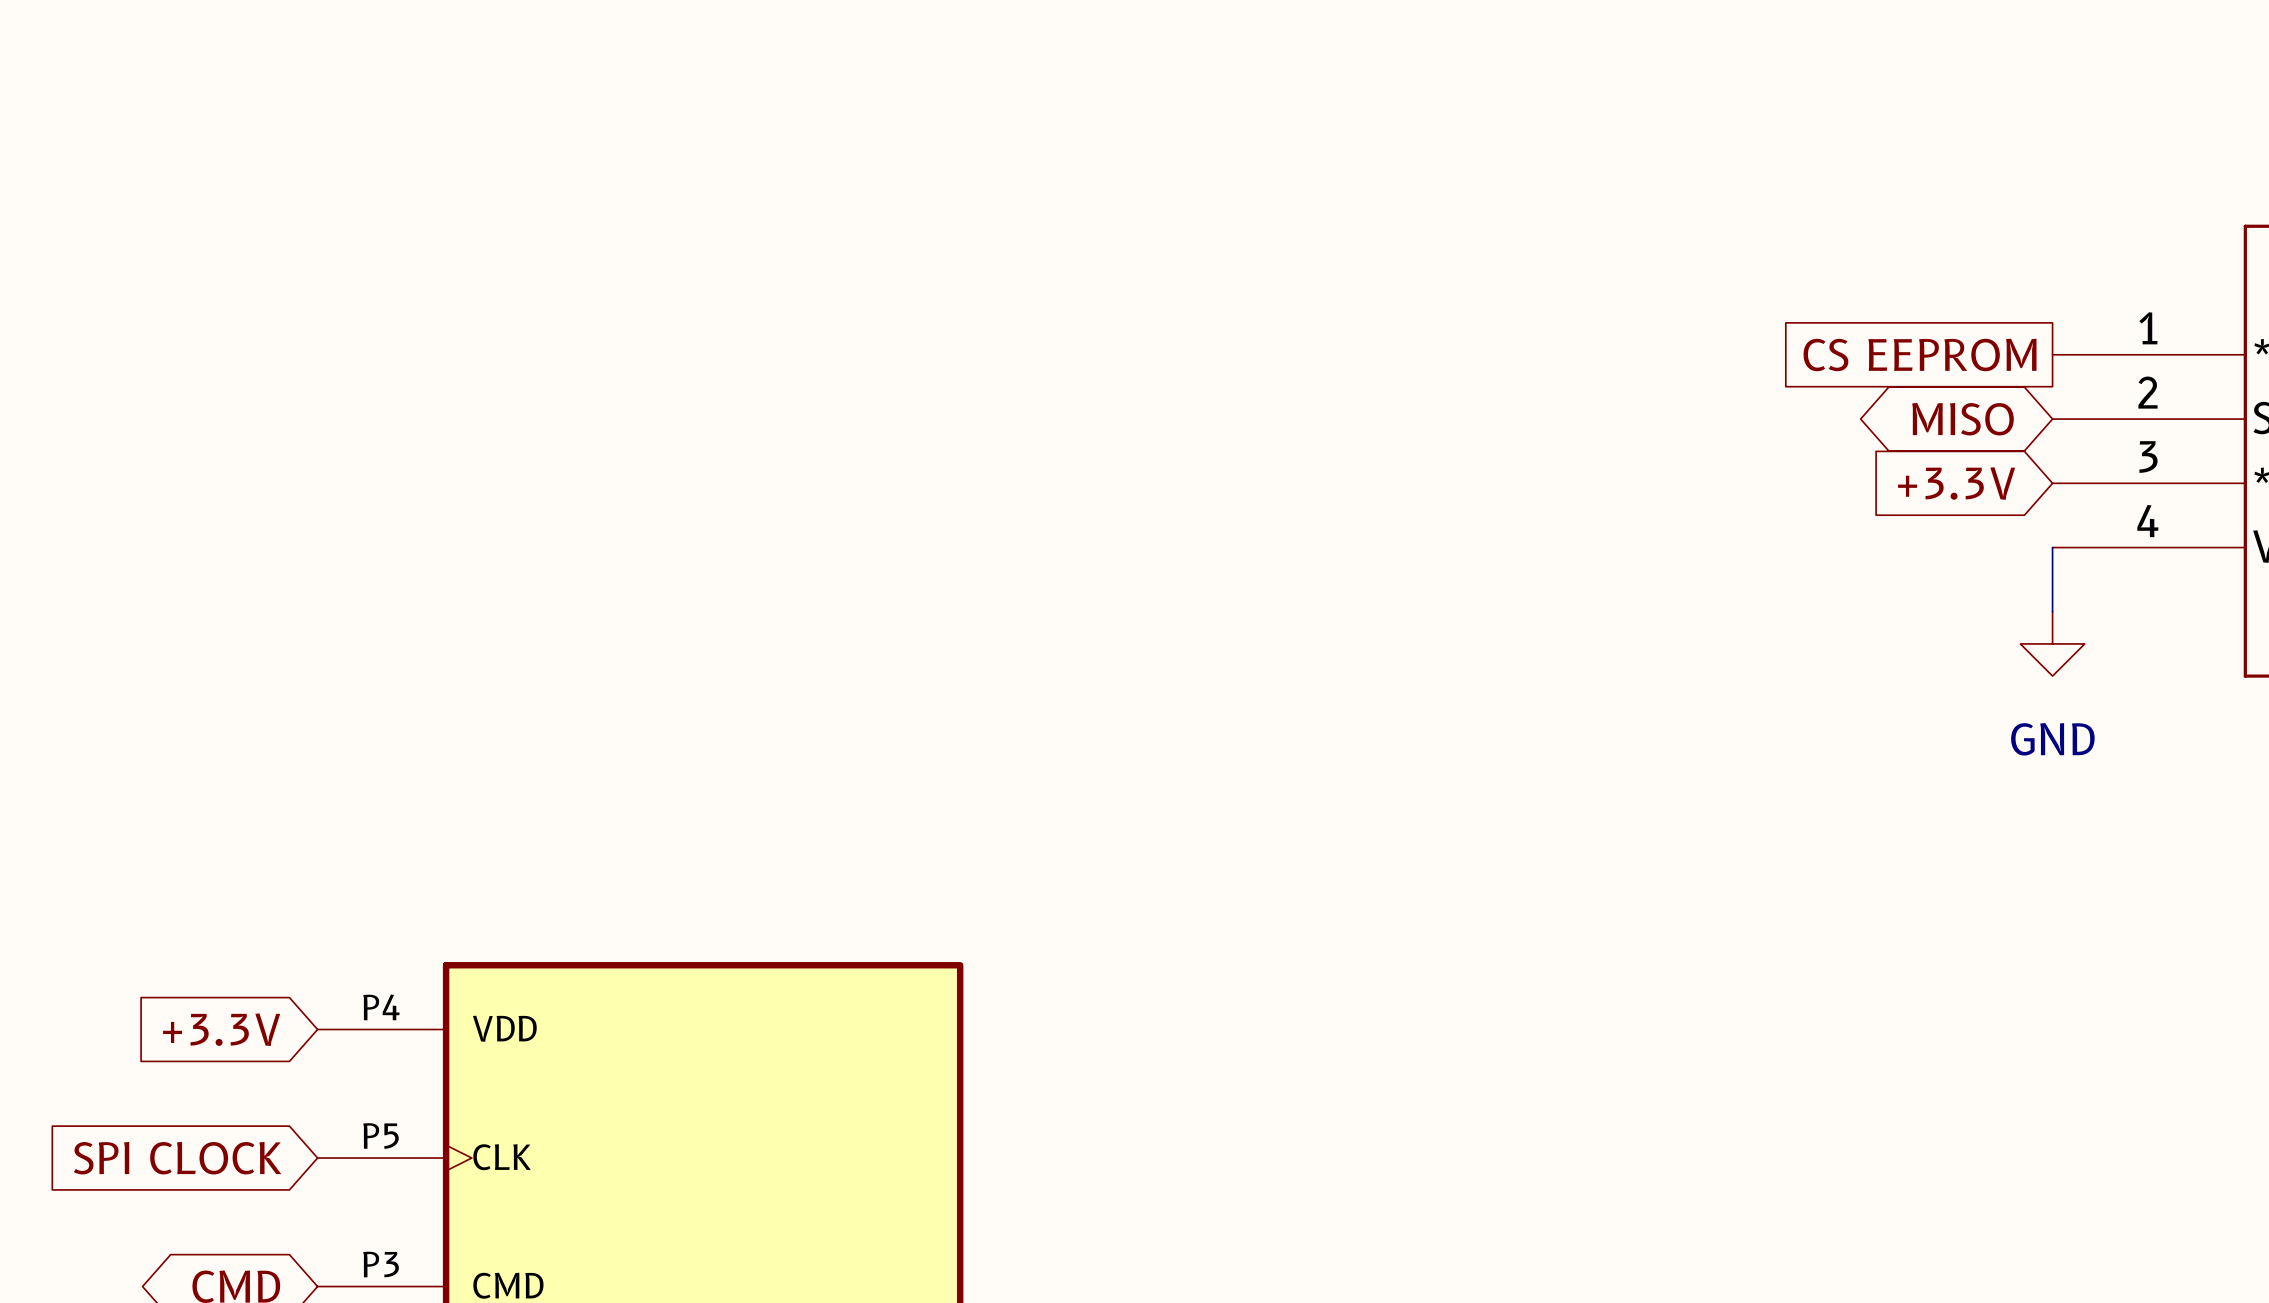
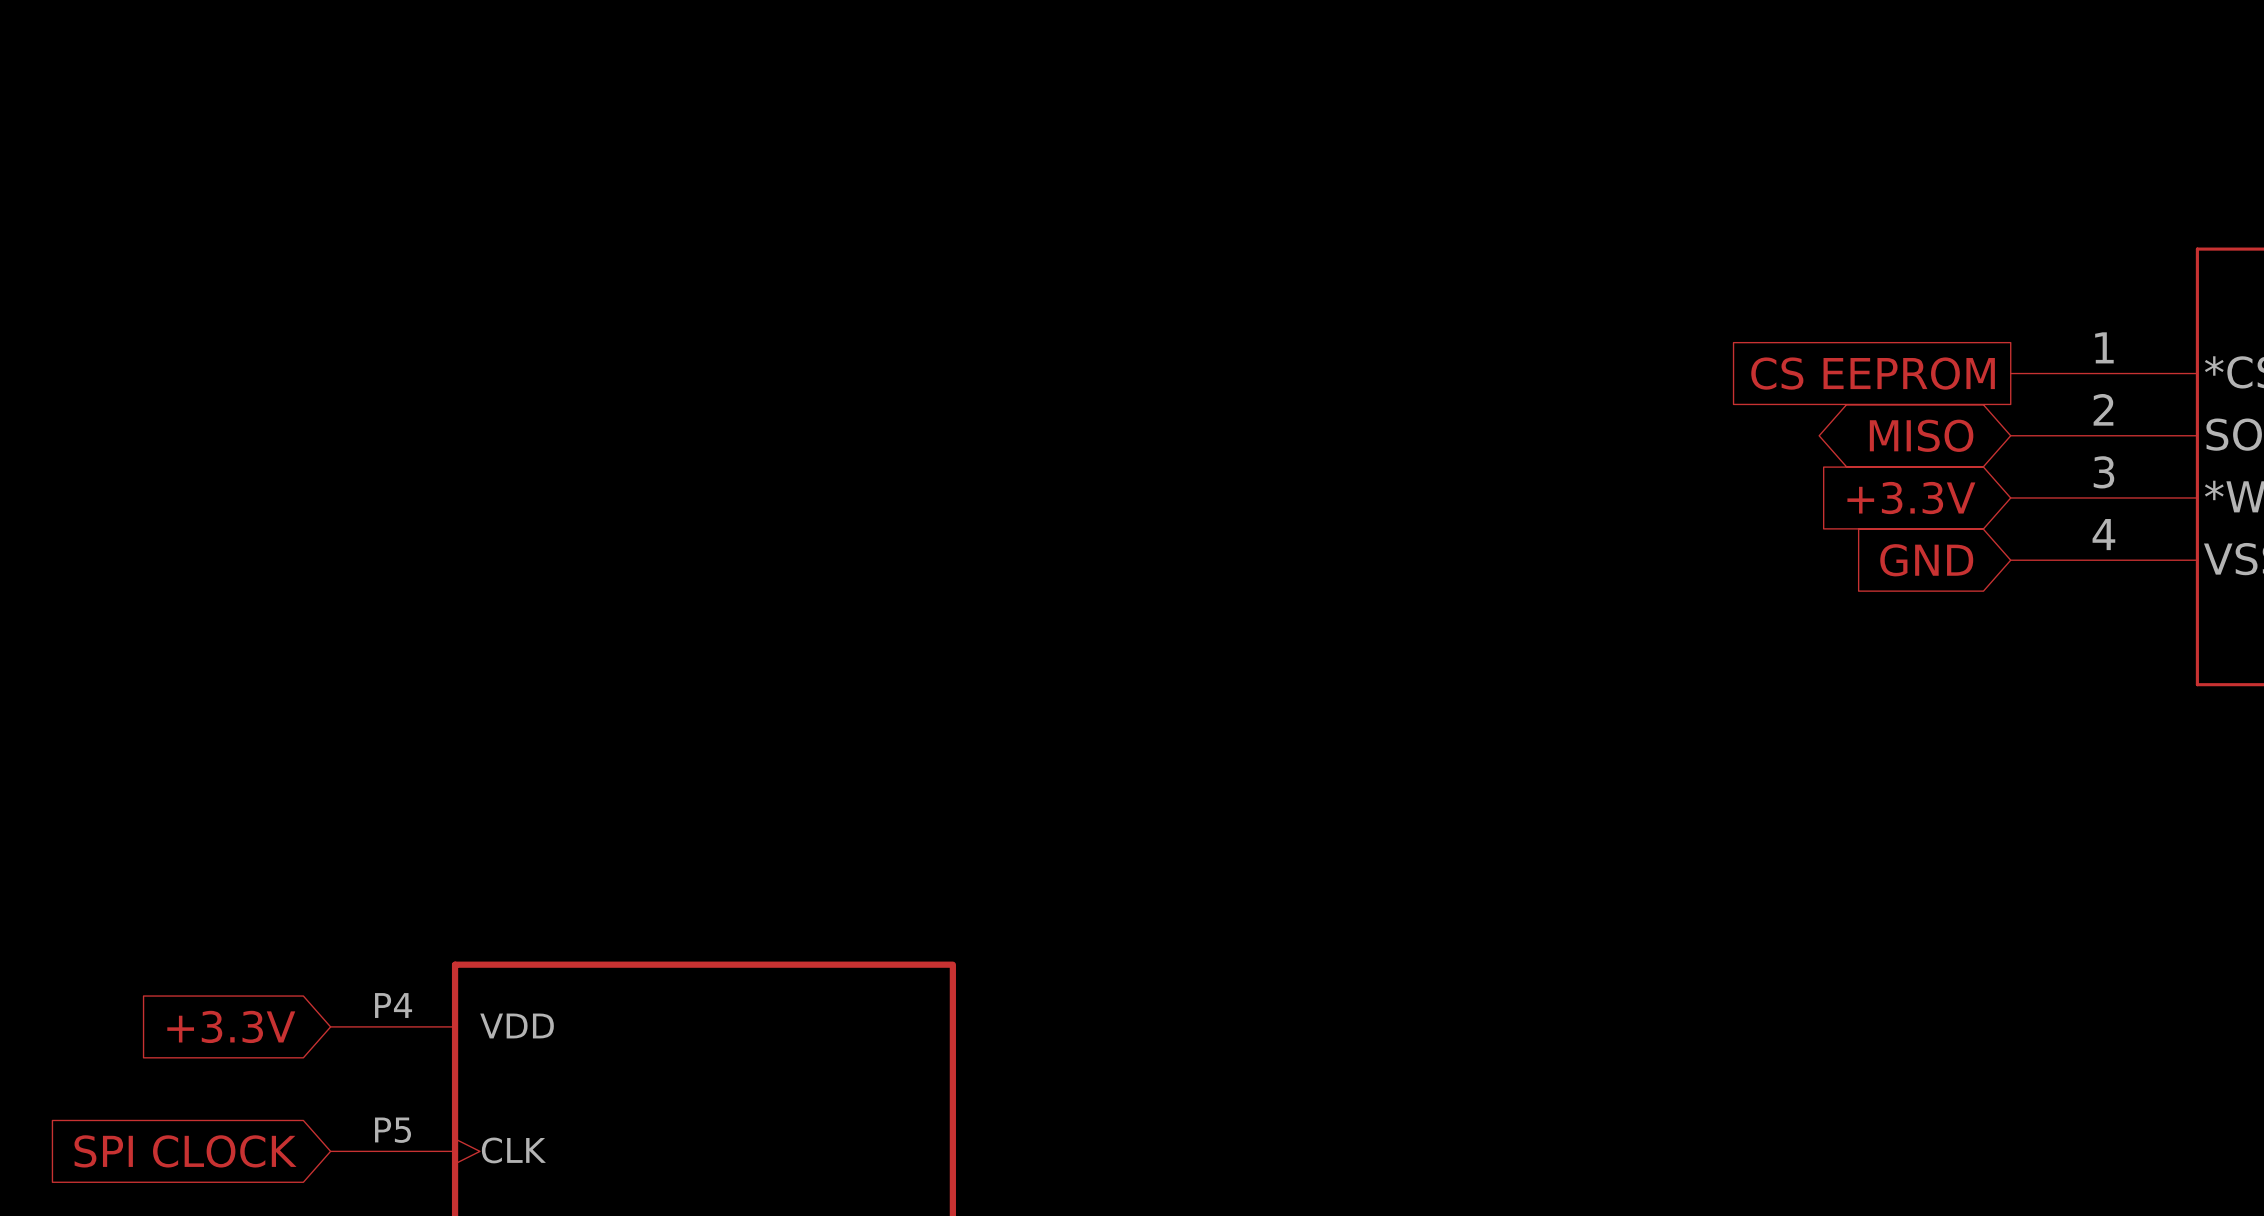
global label: none -> GND (1926, 560)
wire: (2052, 547) (2052, 611) -> none
power symbol: GND (2052, 643) -> none

